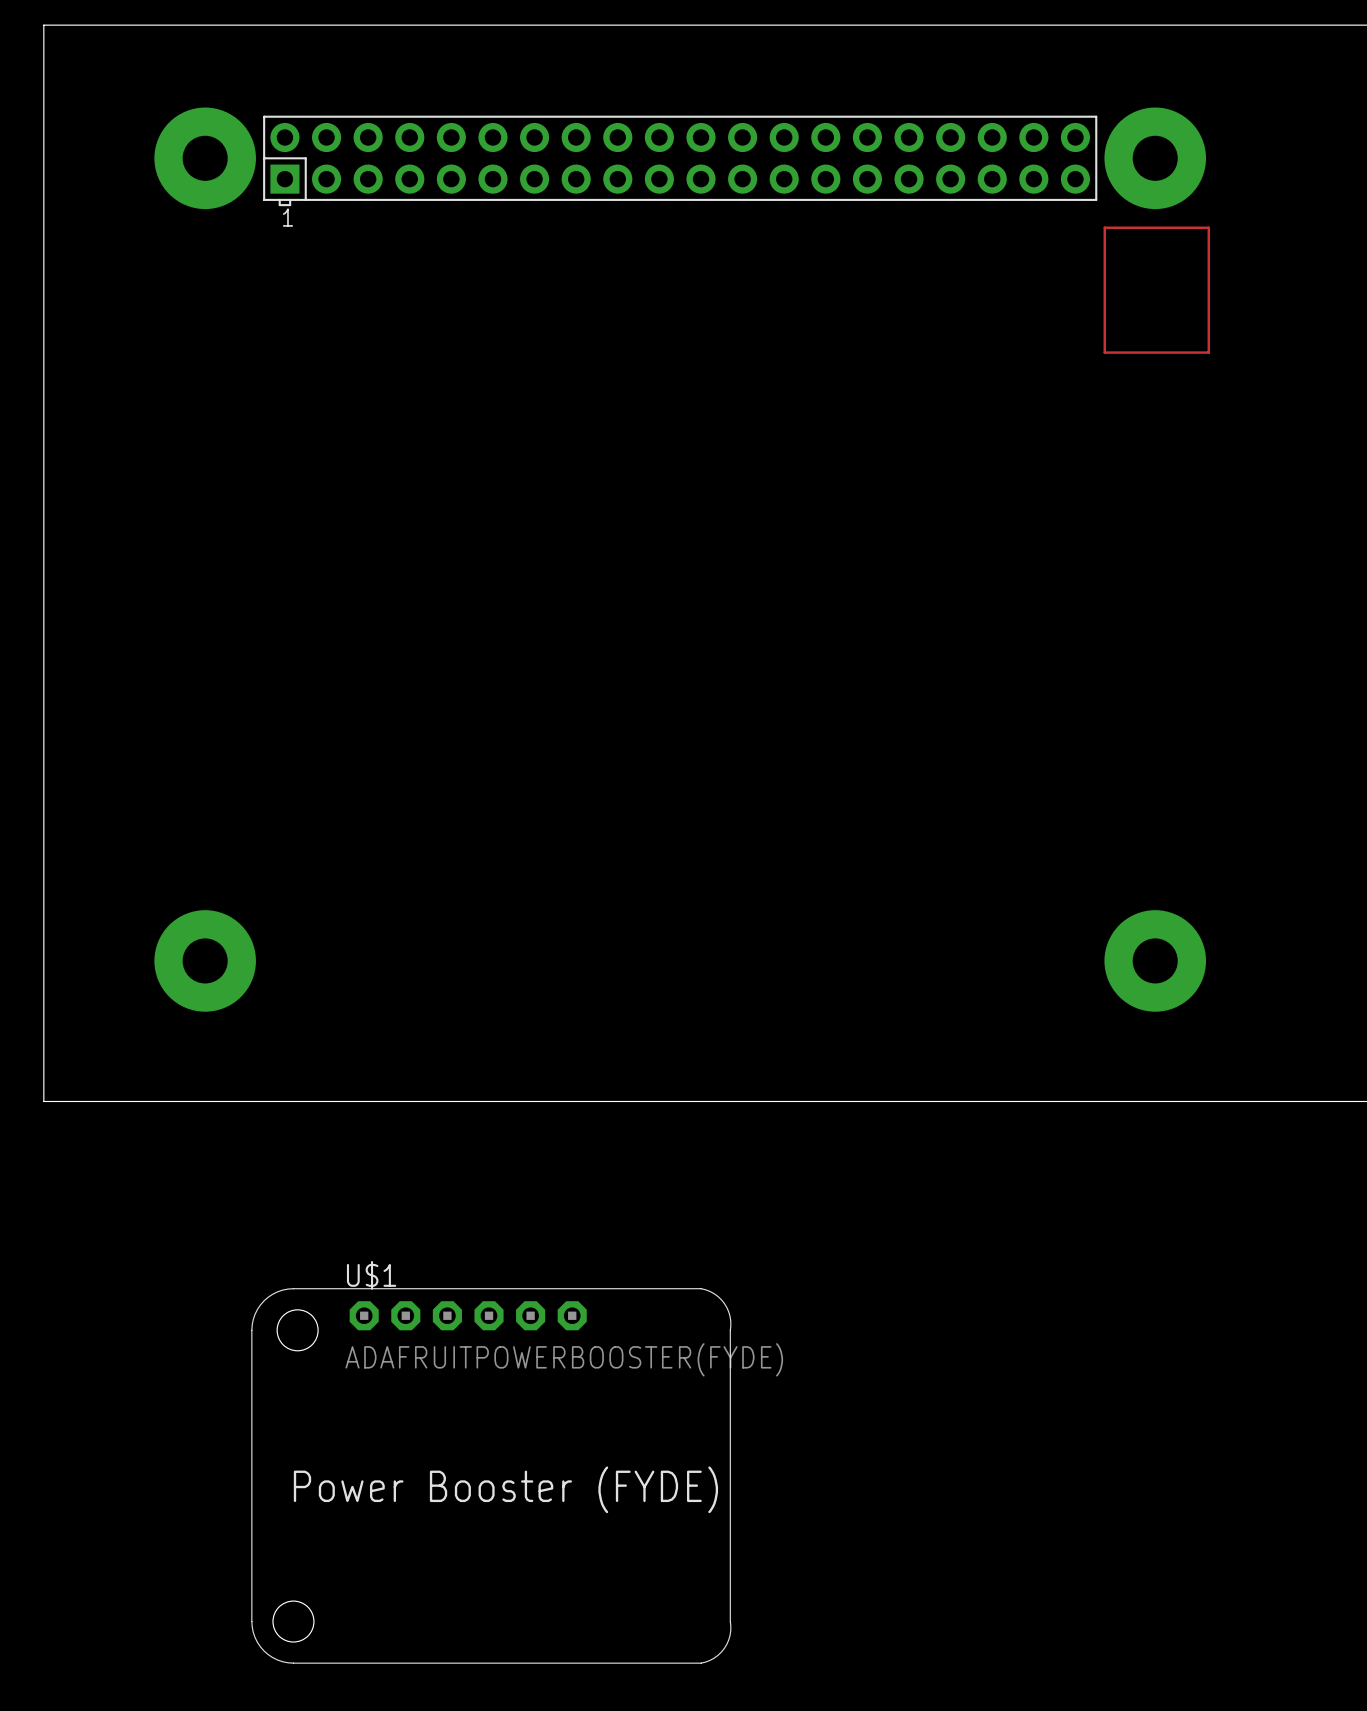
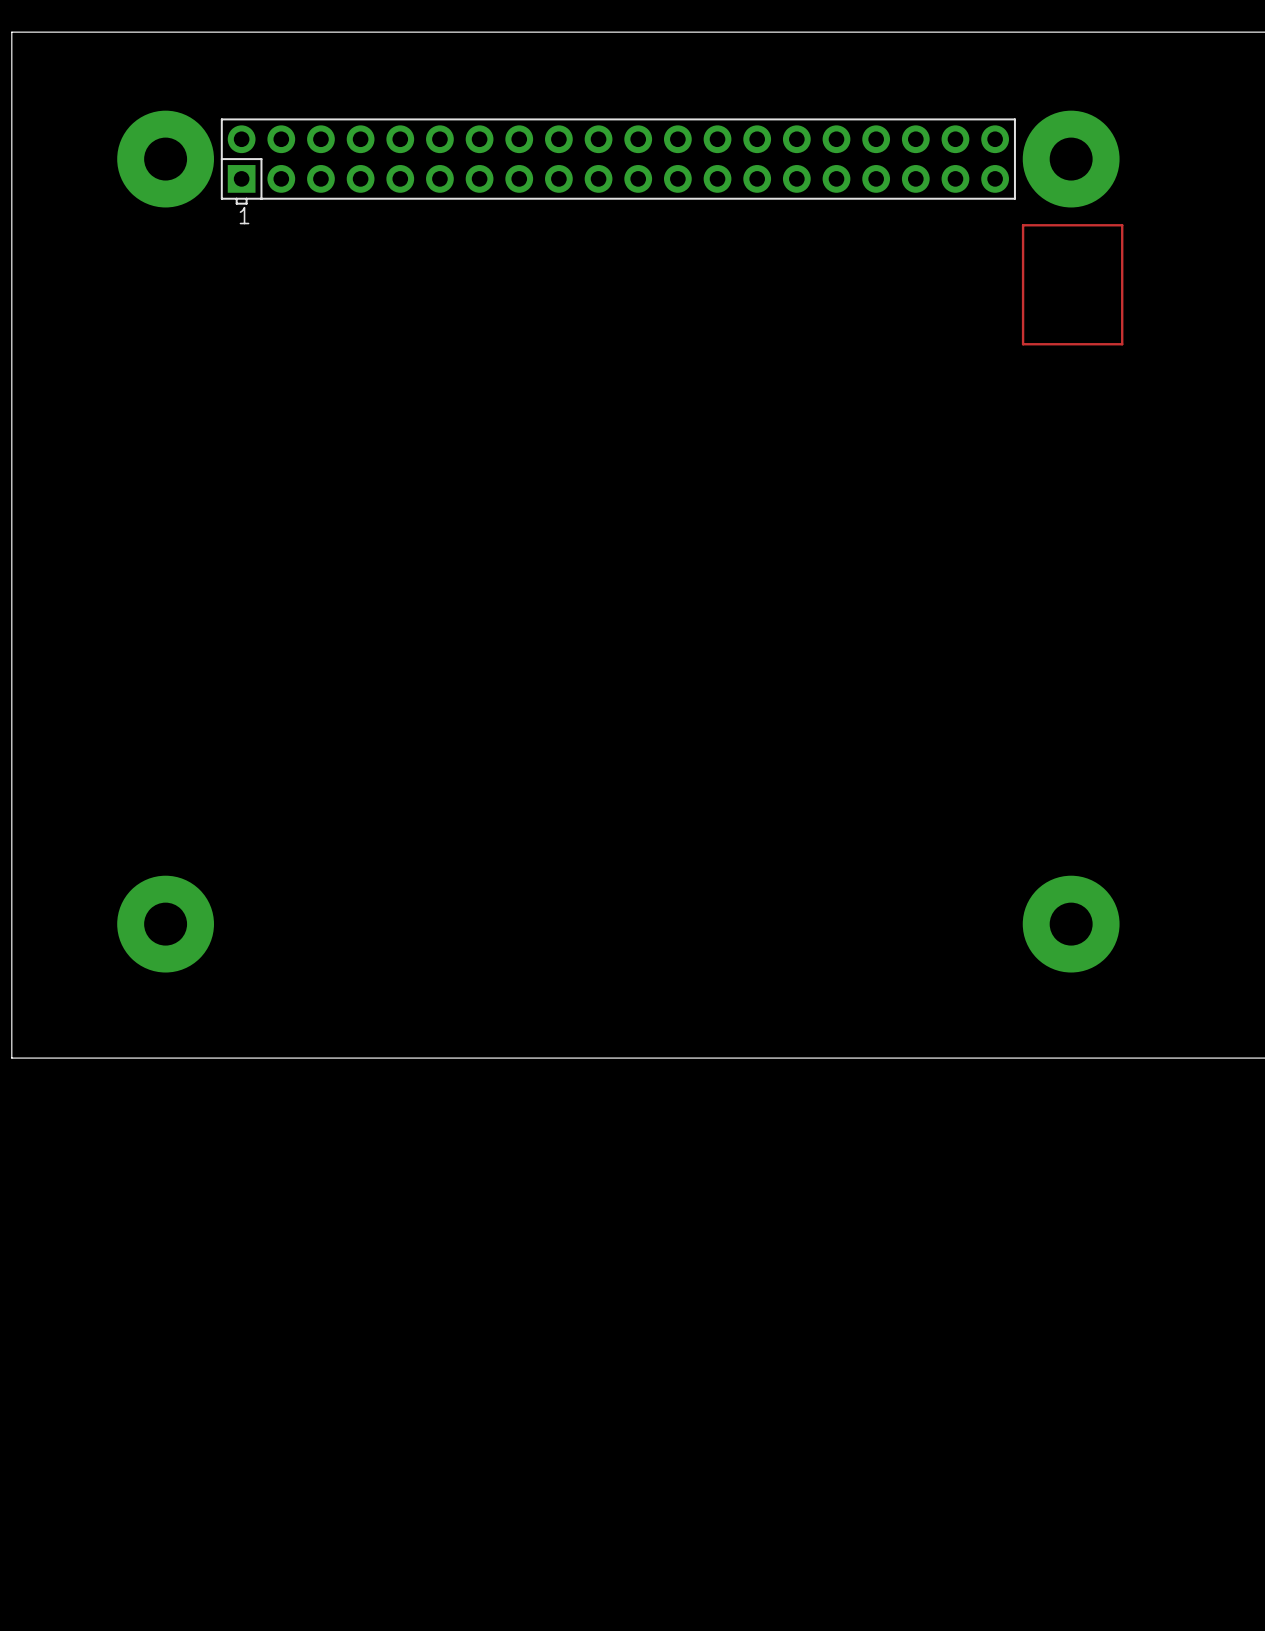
U$1: ADAFRUITPOWERBOOSTER(FYDE) (491, 1475) -> none

